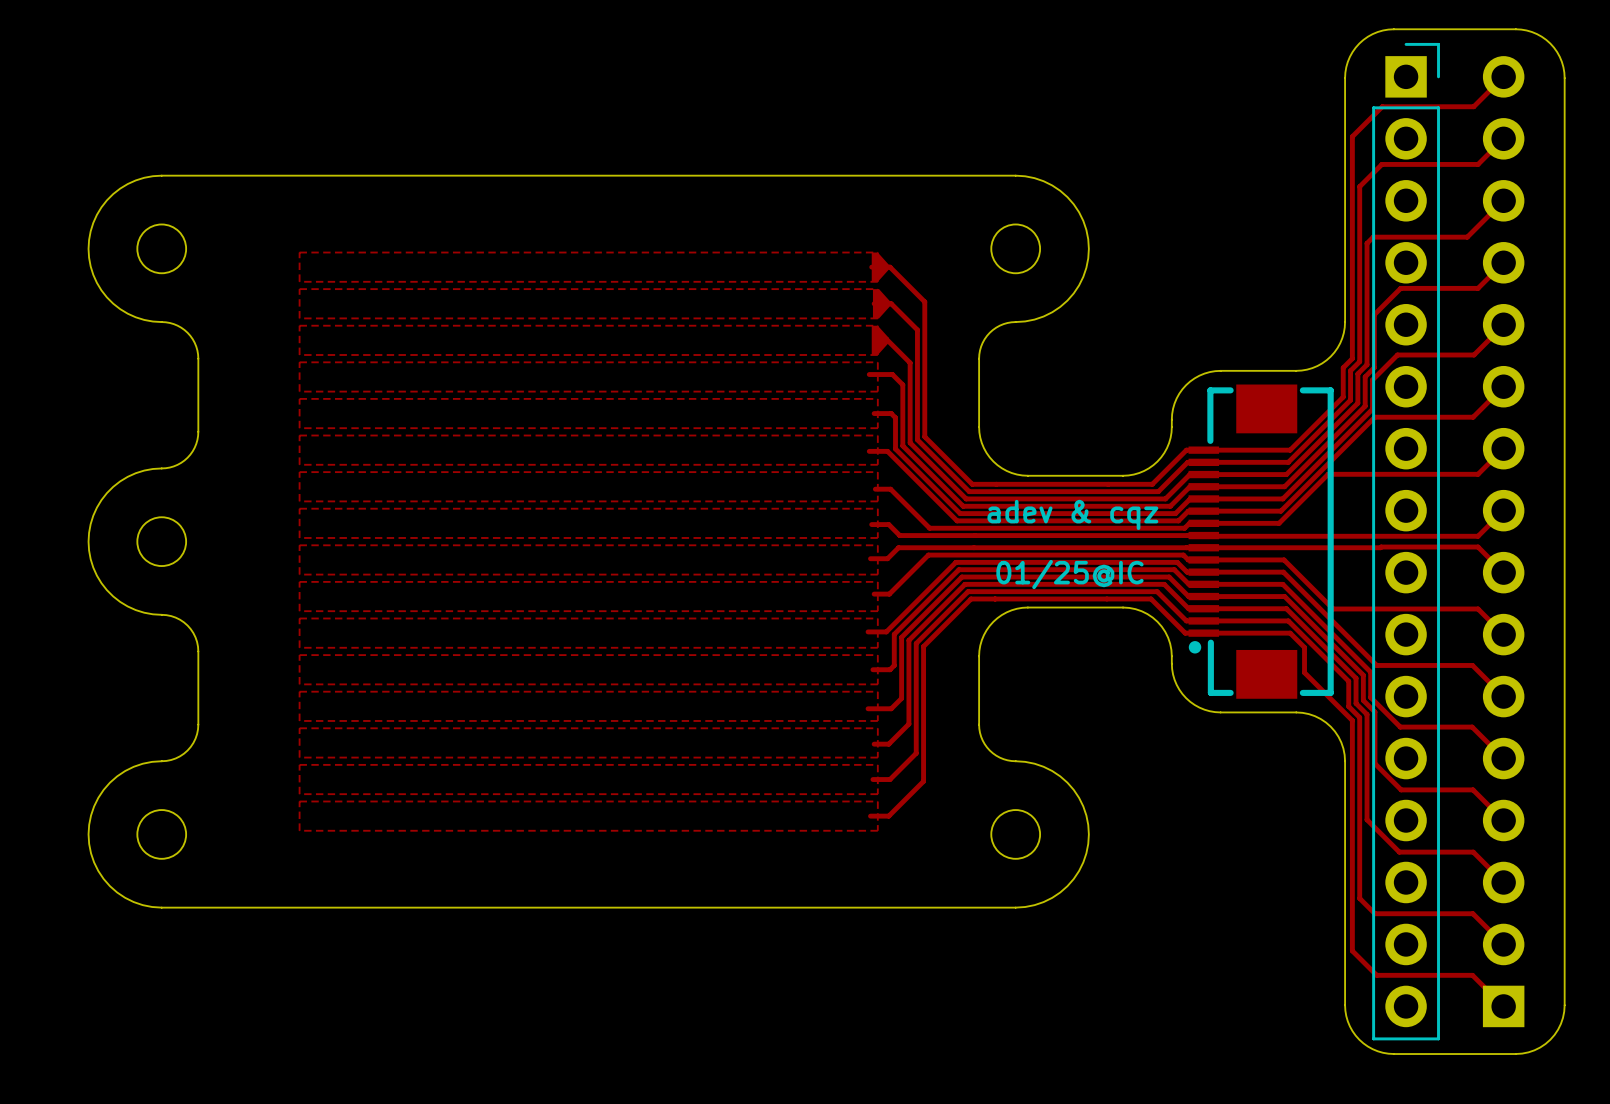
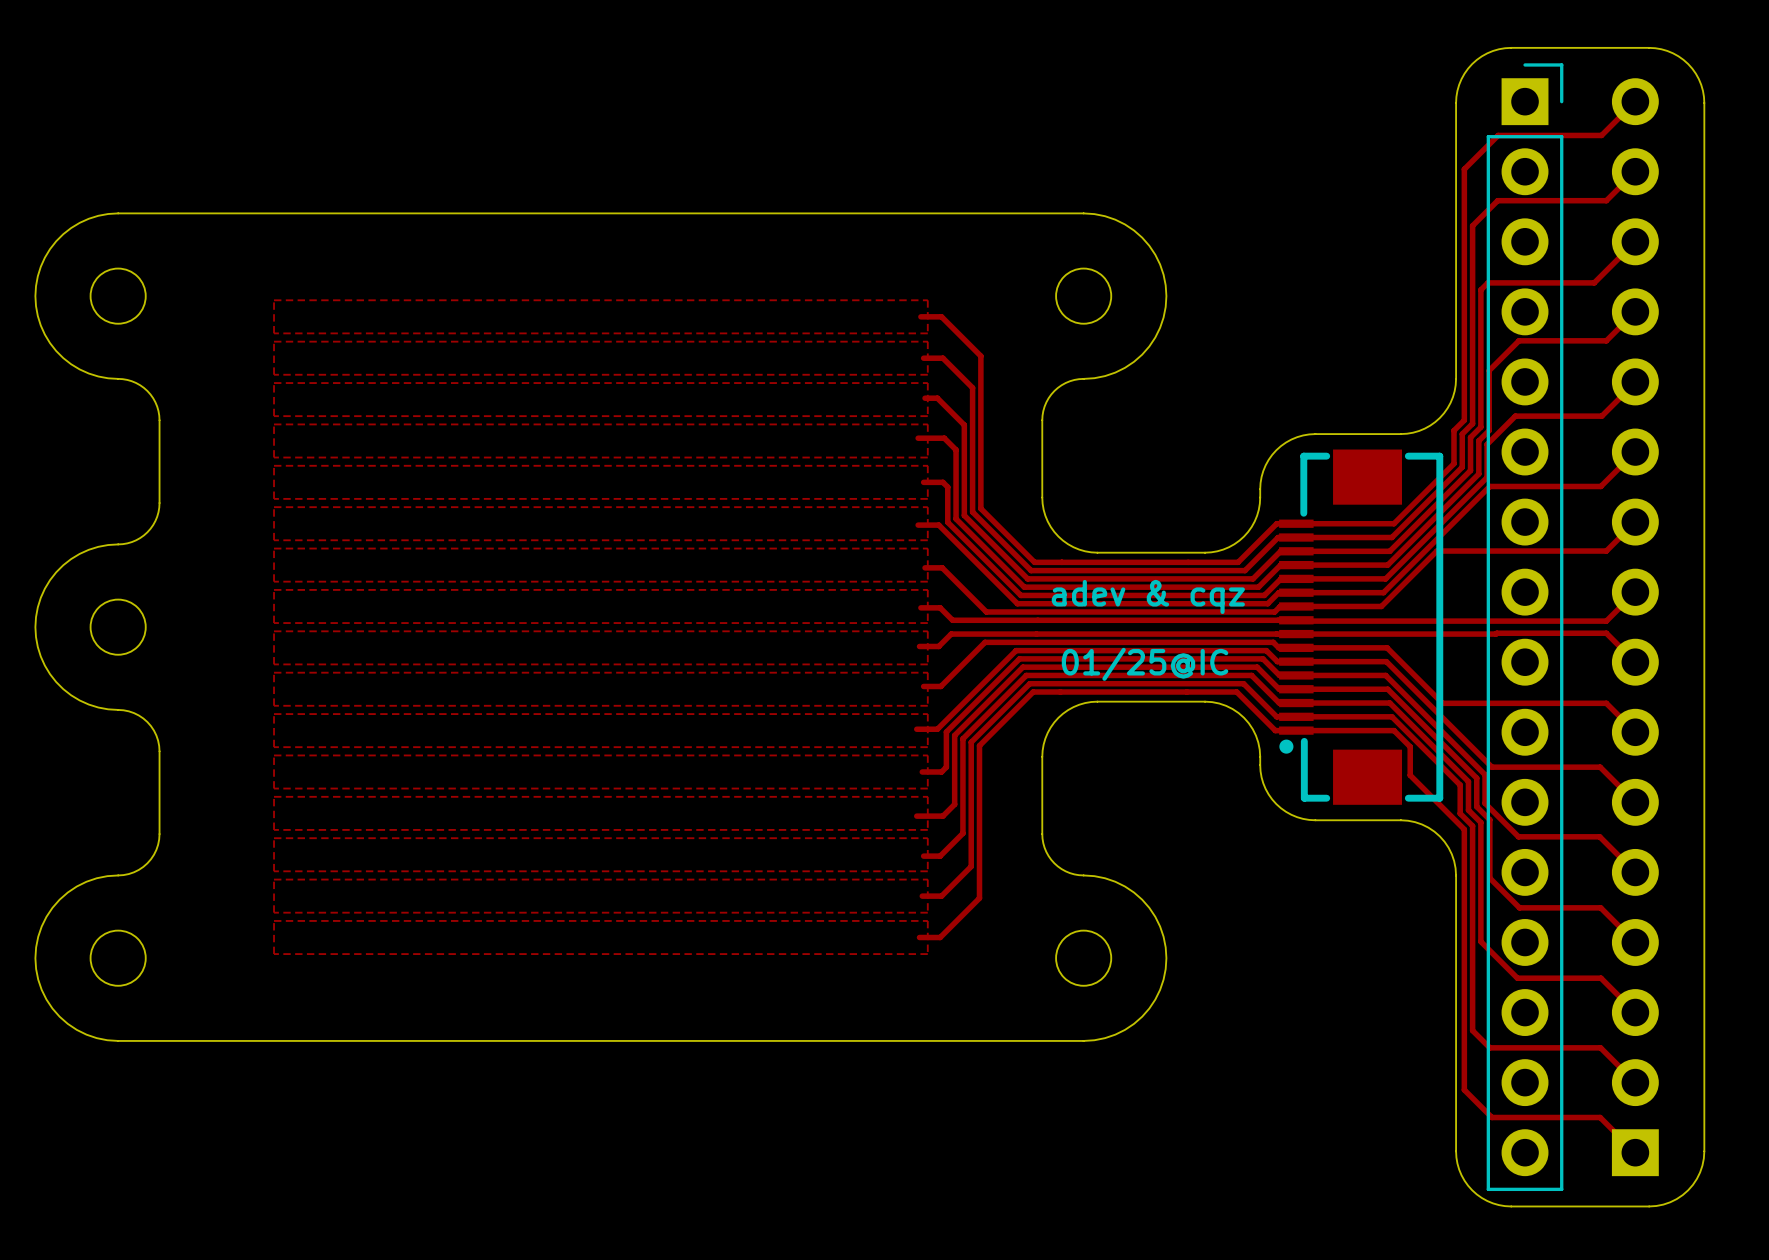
drawing: [871, 252, 891, 355] -> none

